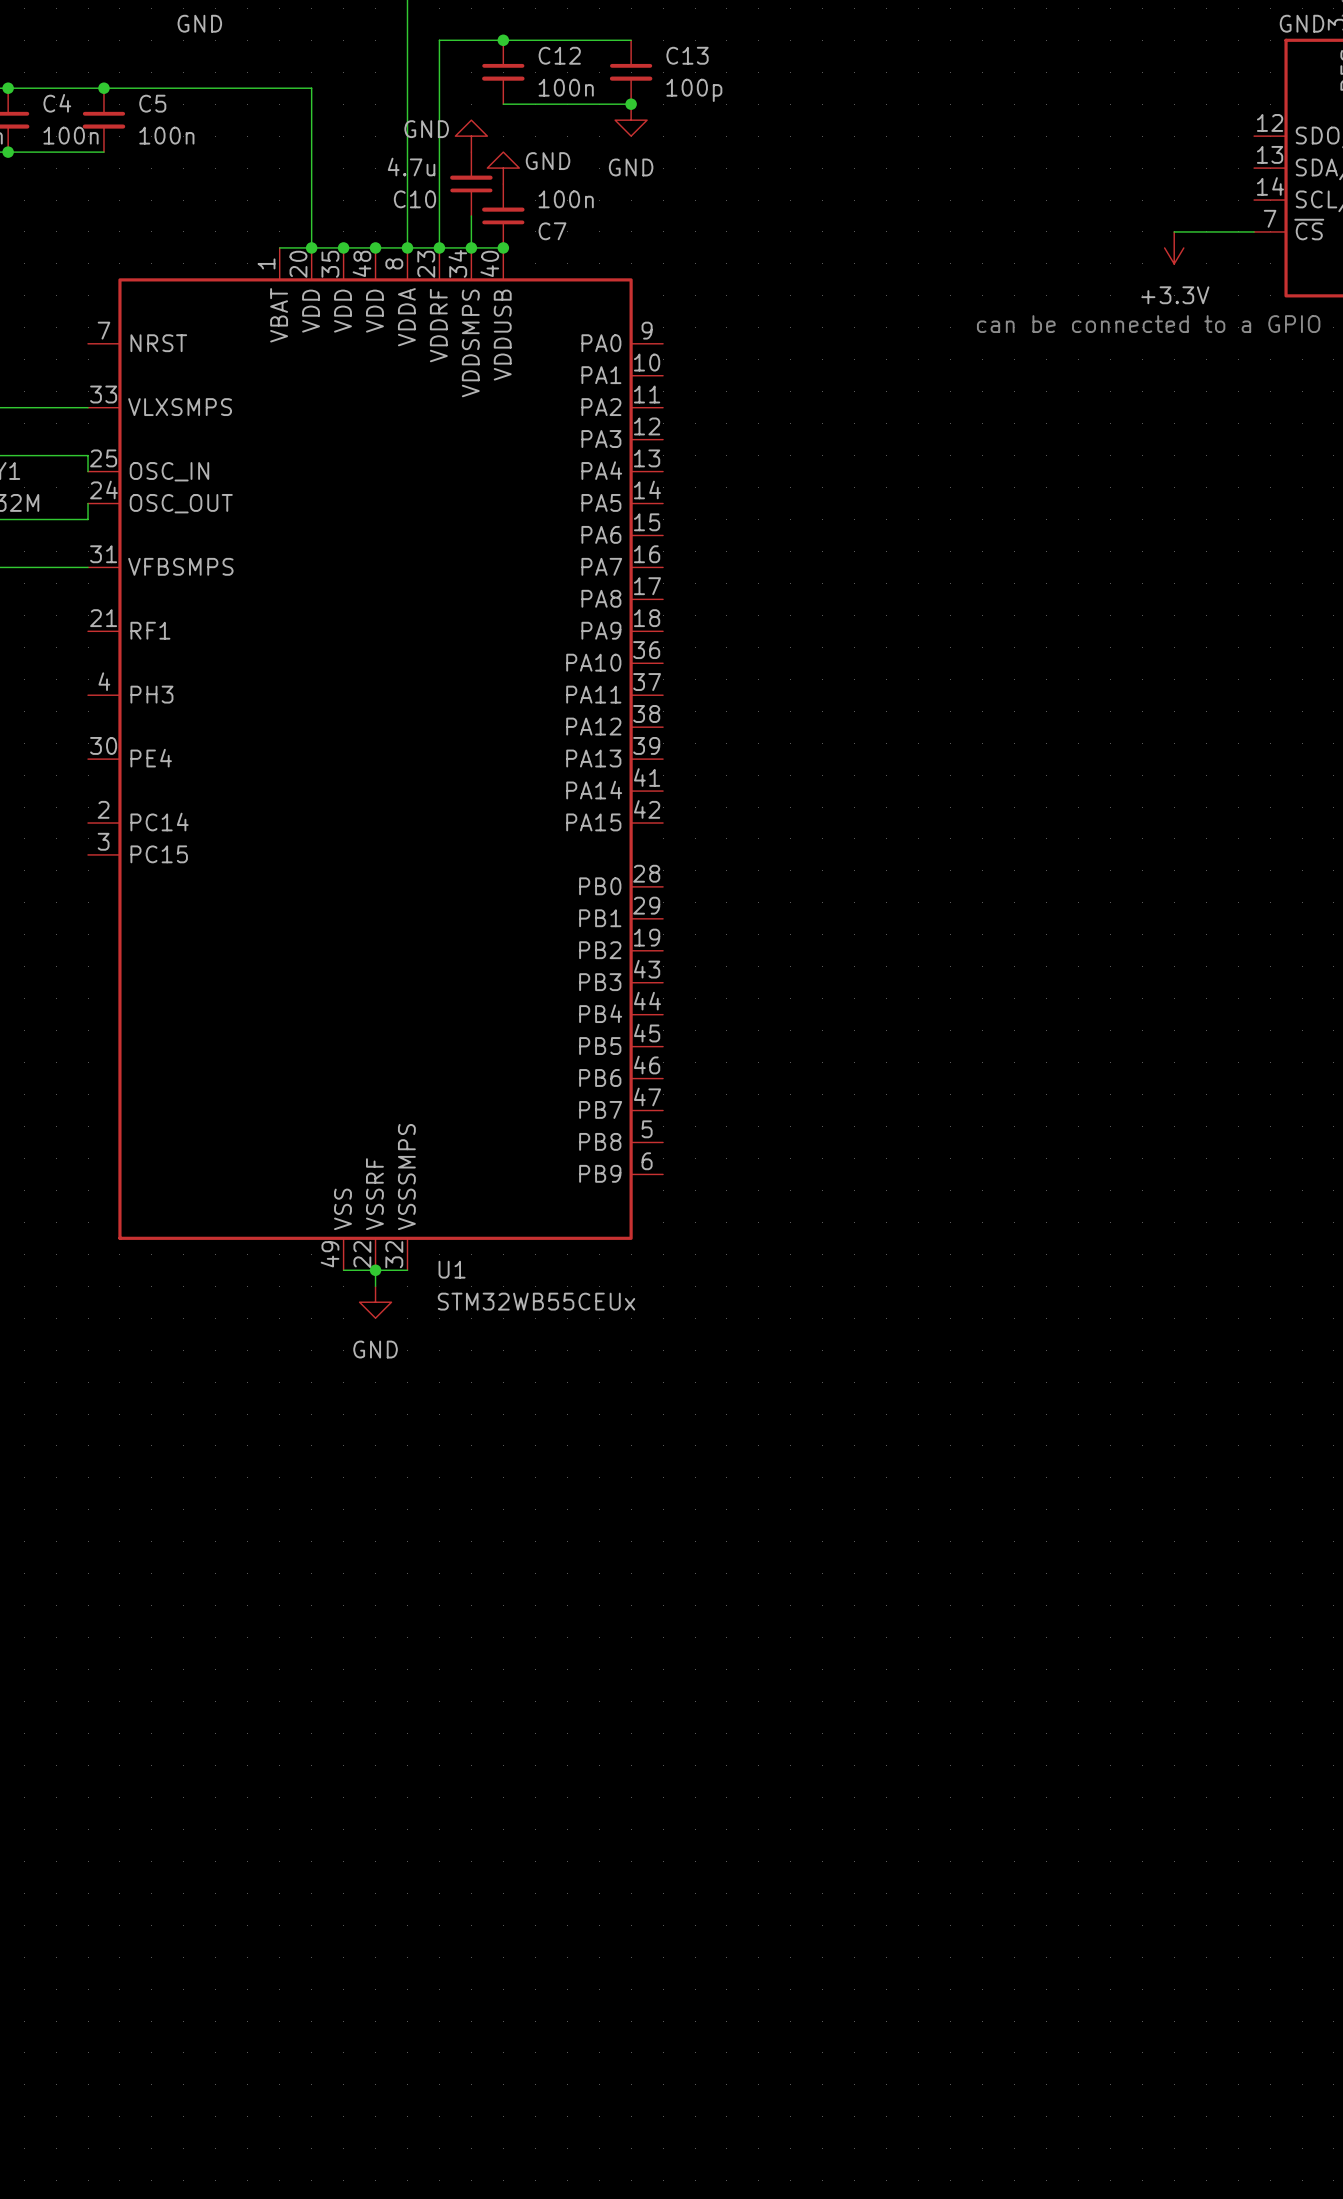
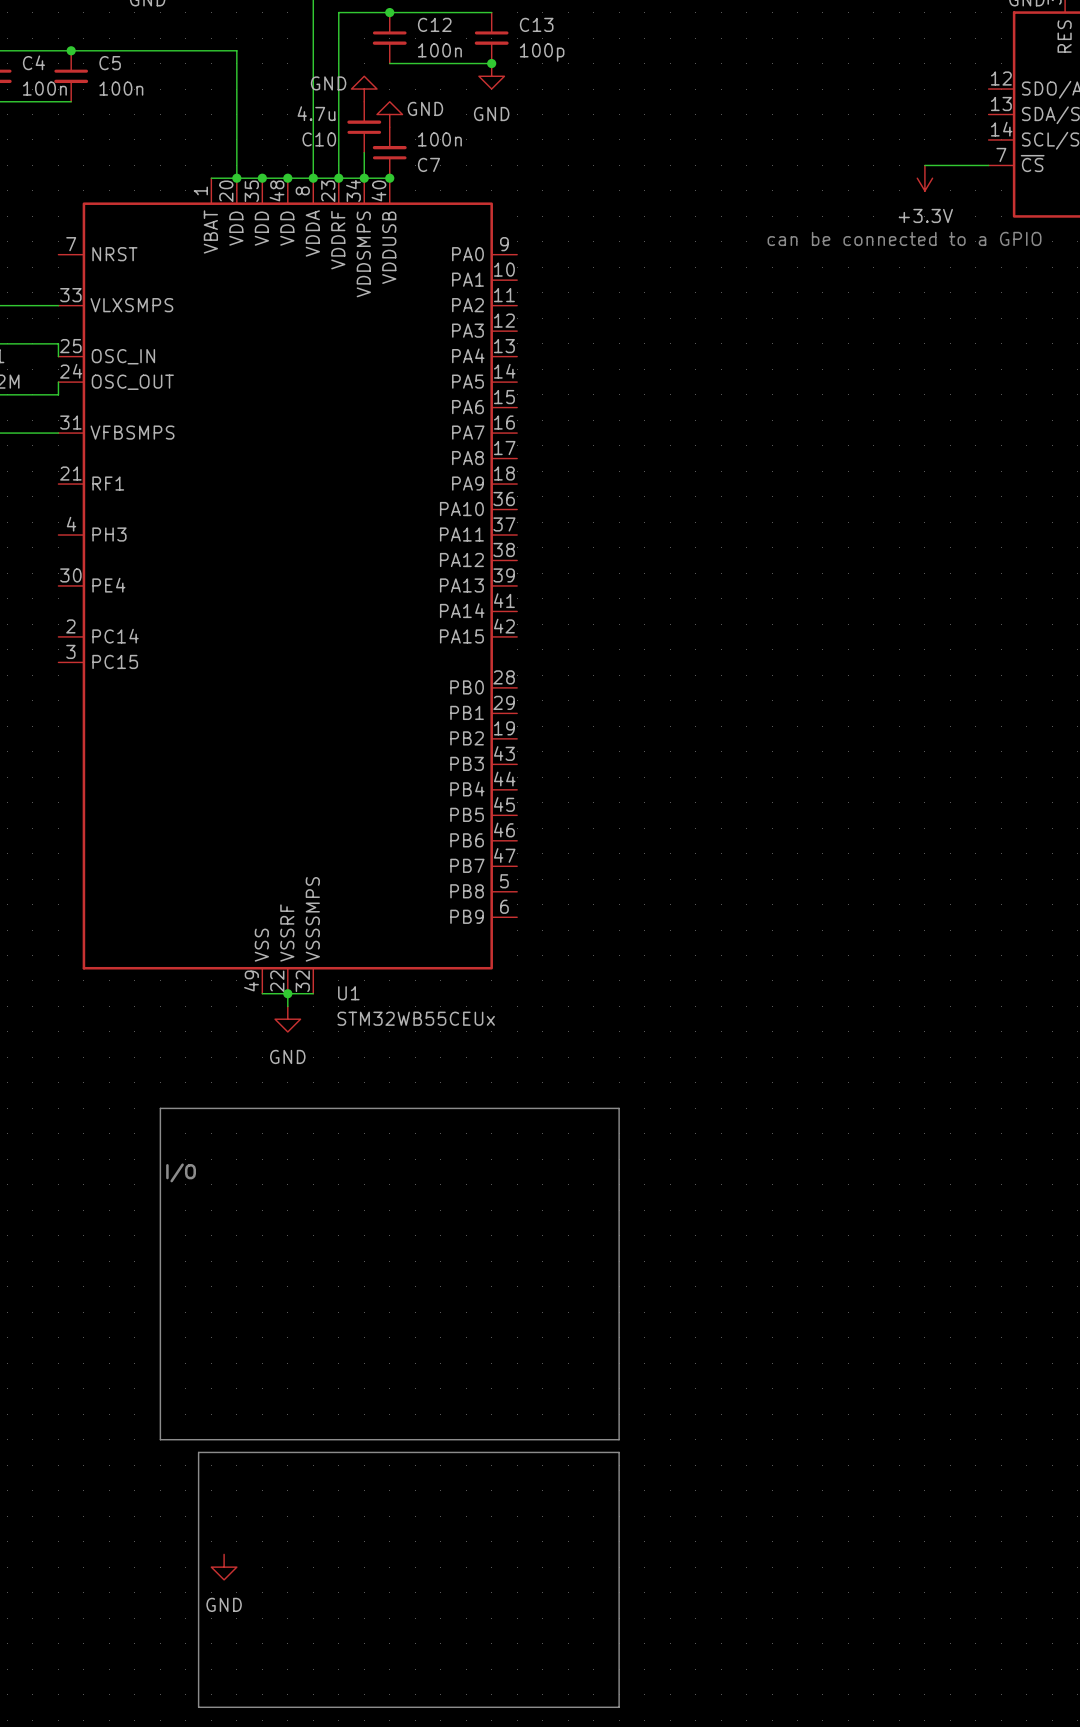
line: none -> (160, 1108) (619, 1108) (619, 1439) (160, 1439) (160, 1108)
text: none -> I/O (181, 1172)
line: none -> (198, 1452) (619, 1452) (619, 1707) (198, 1707) (198, 1452)
power symbol: none -> GND (224, 1567)

